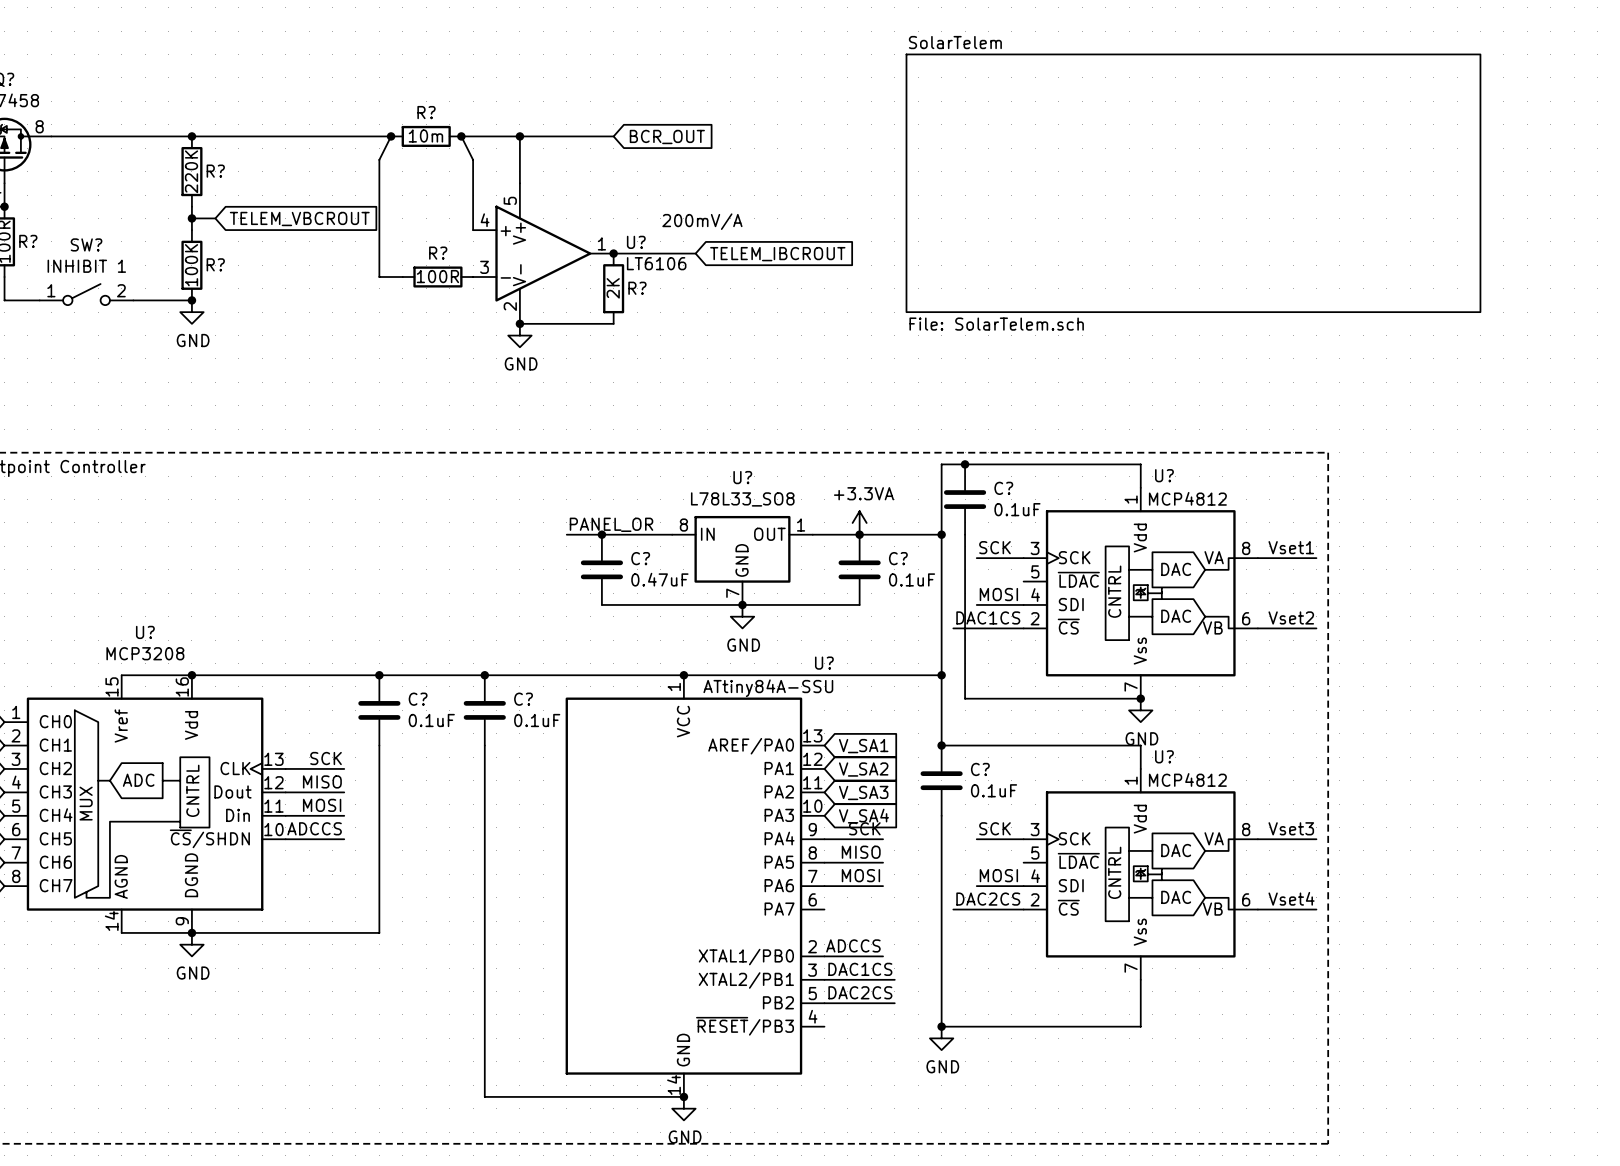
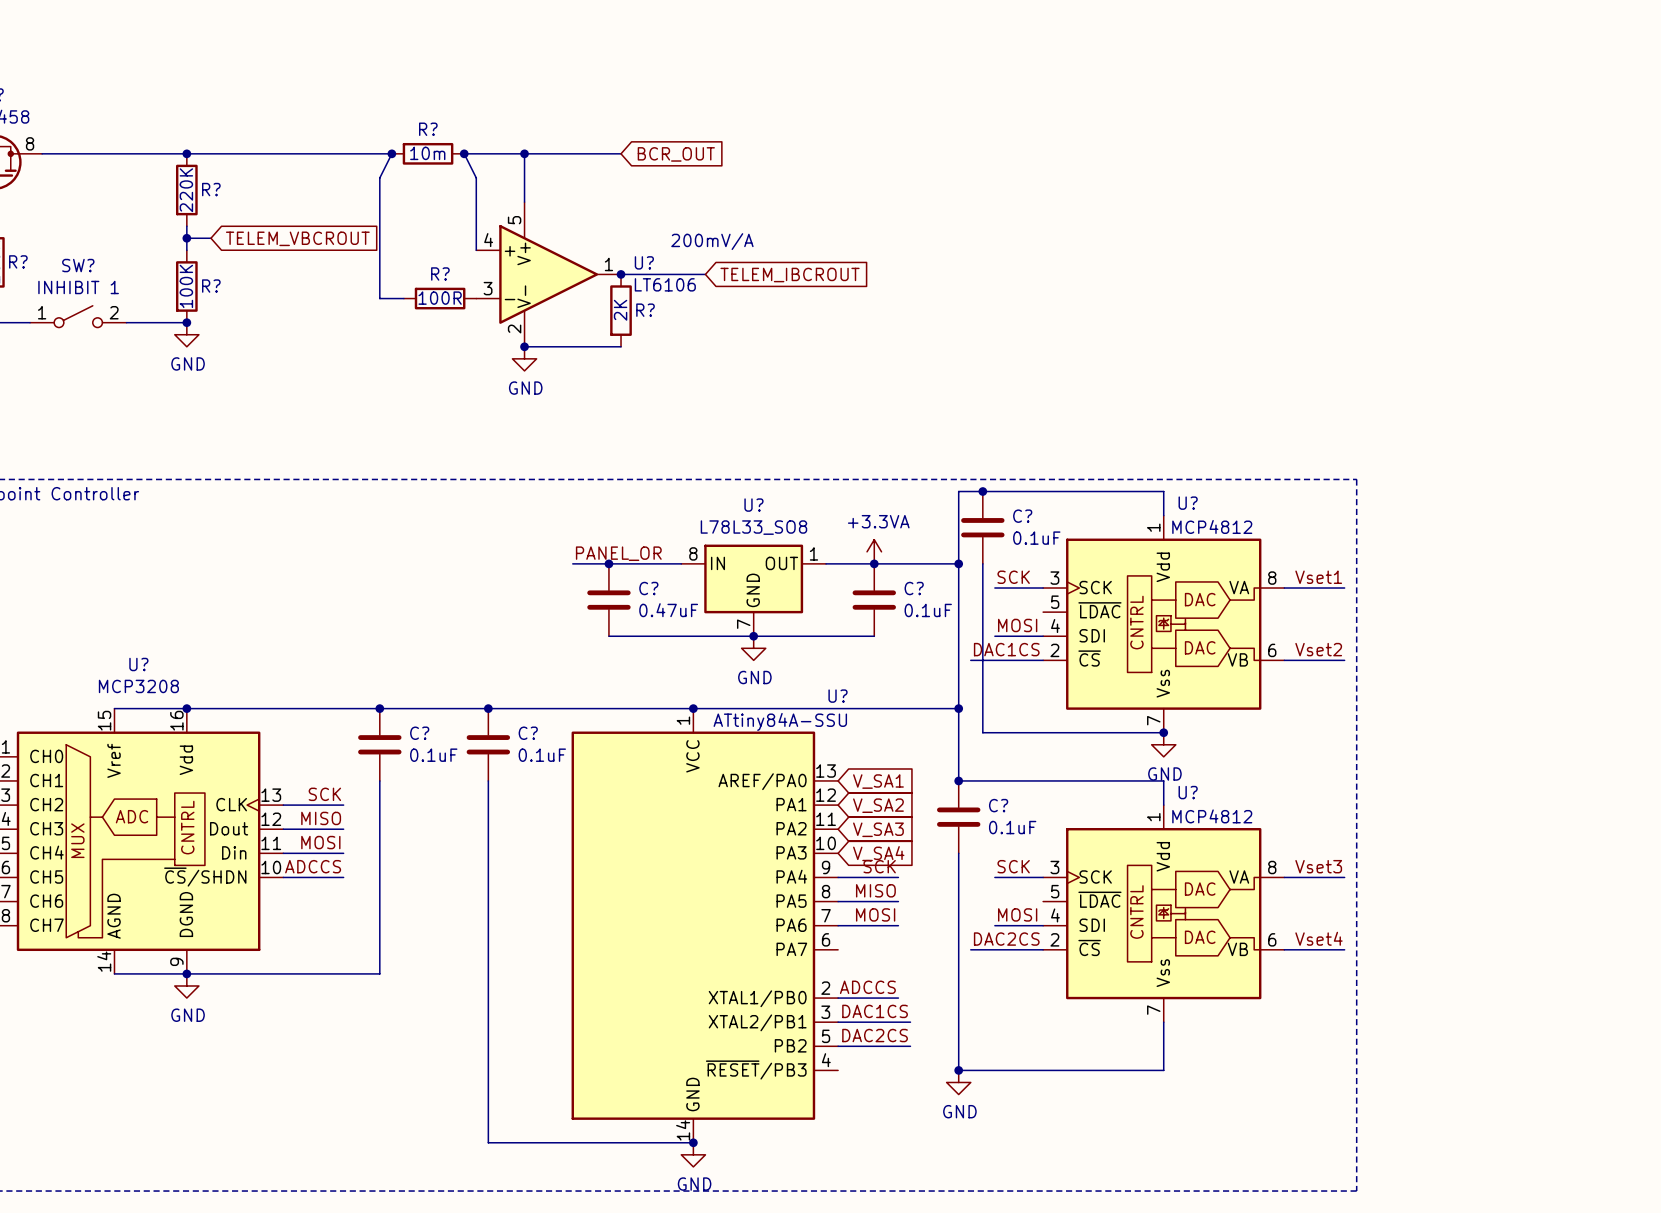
sheet SolarTelem: File: SolarTelem.sch (1193, 183) -> none

